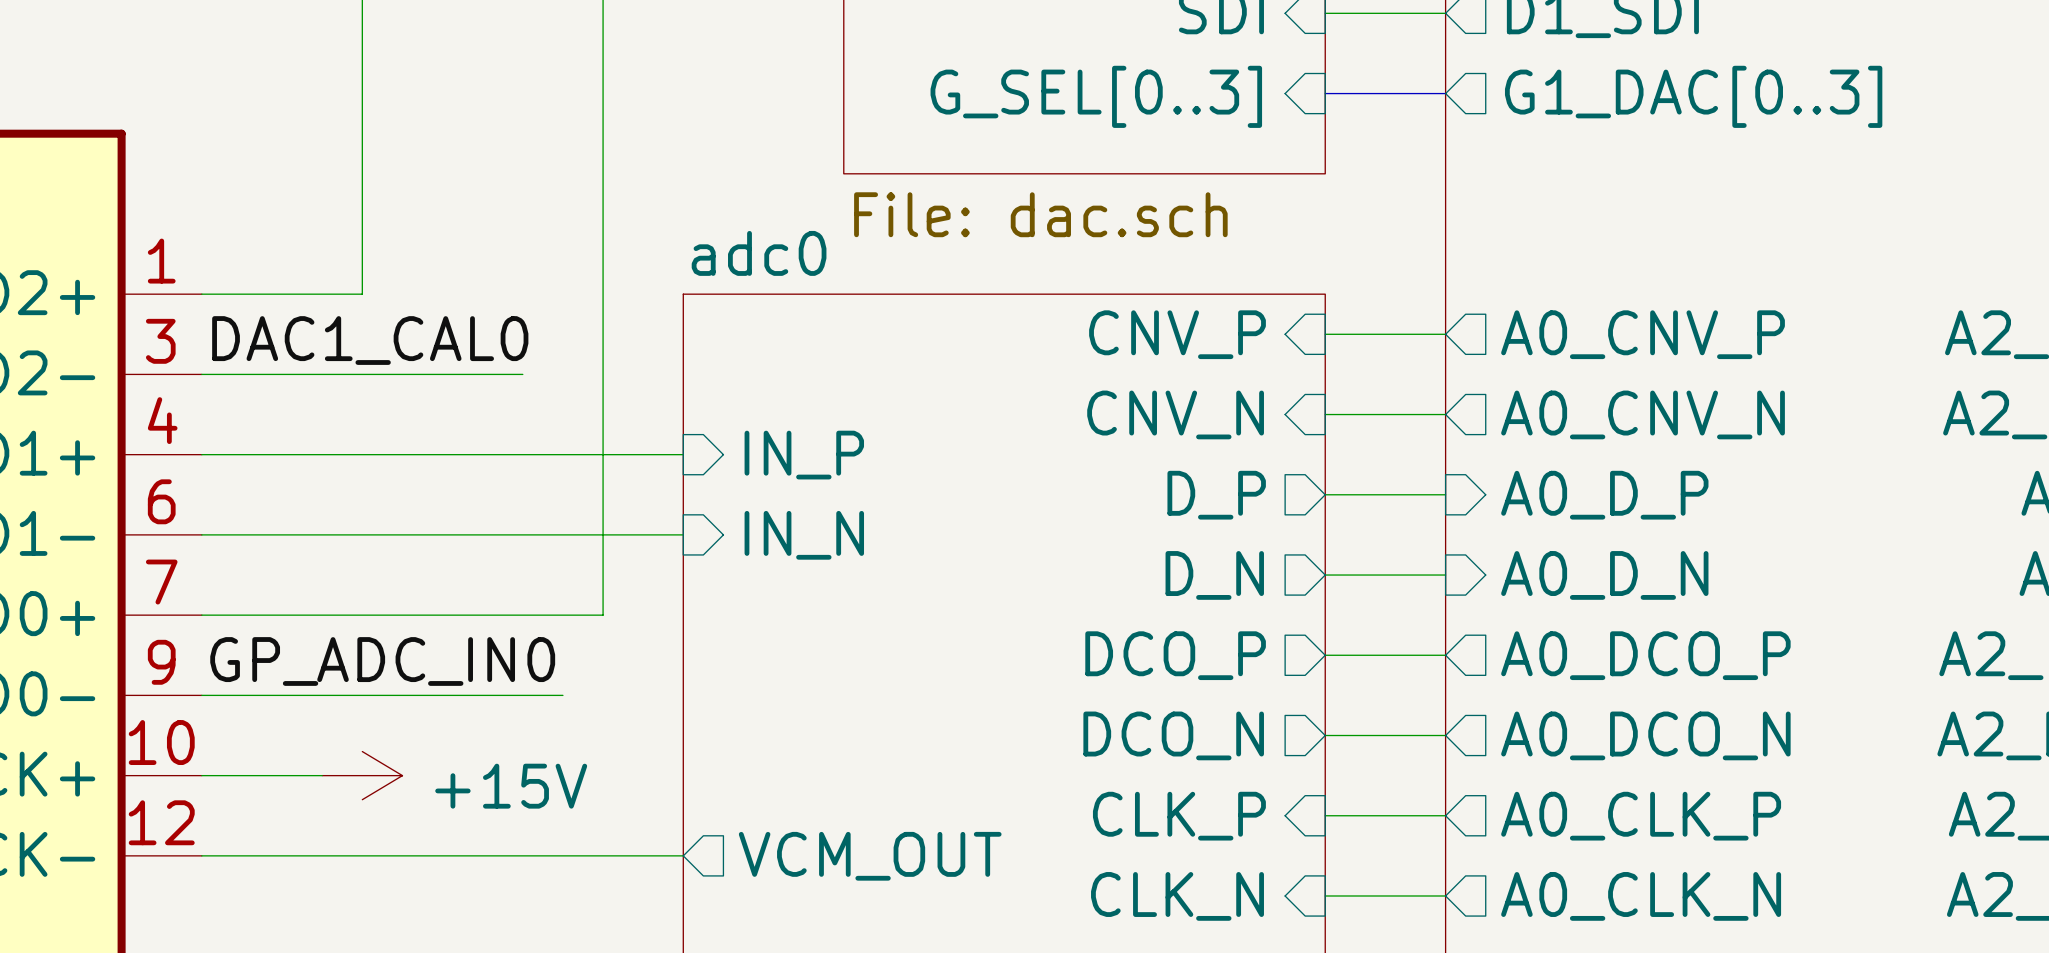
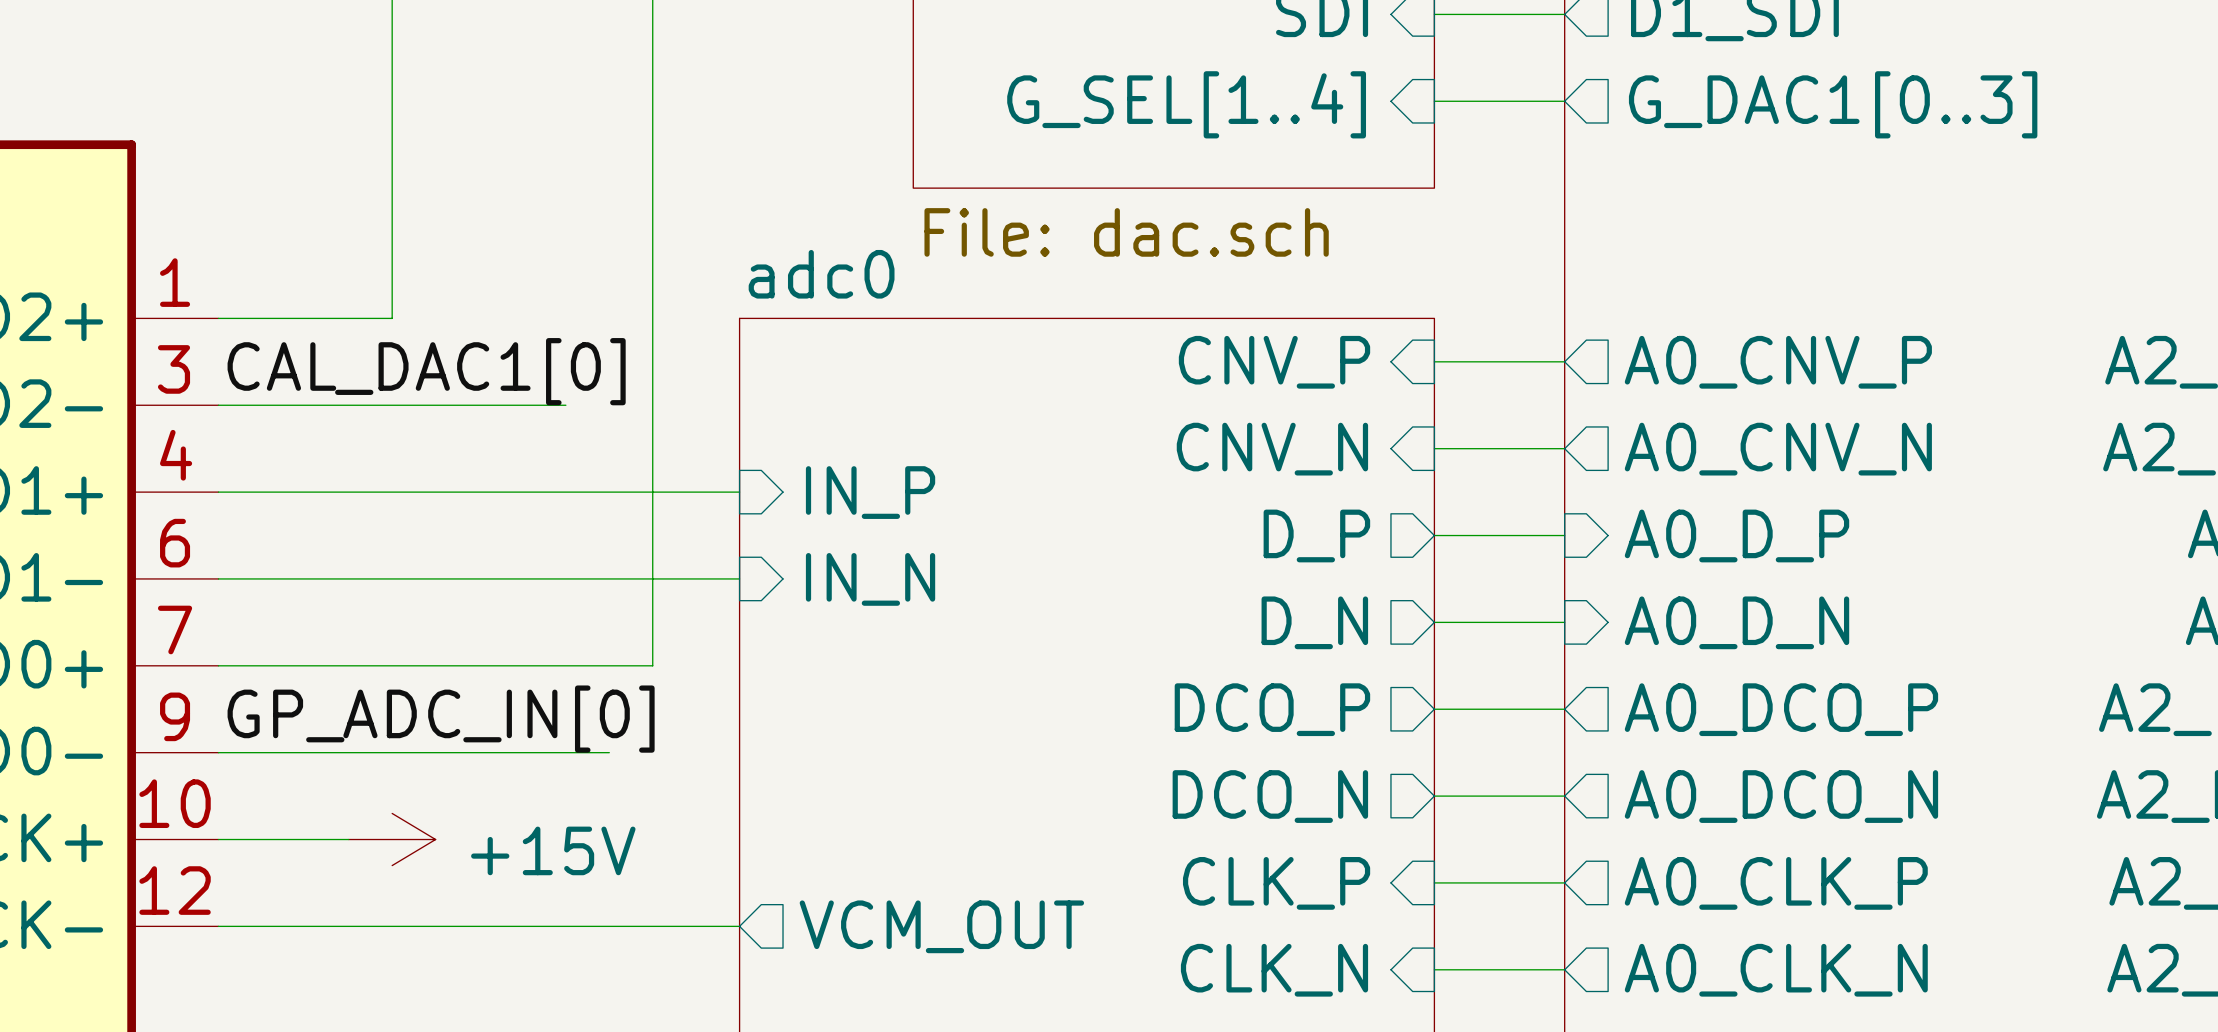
bus: (1325, 93) (1445, 93) -> none
sheet pin: G_SEL[0..3] (1096, 96) -> G_SEL[1..4] (1186, 104)
sheet pin: G1_DAC[0..3] (1693, 96) -> G_DAC1[0..3] (1833, 104)
label: DAC1_CAL0 (370, 340) -> CAL_DAC1[0] (426, 371)
label: GP_ADC_IN0 (382, 661) -> GP_ADC_IN[0] (441, 719)

